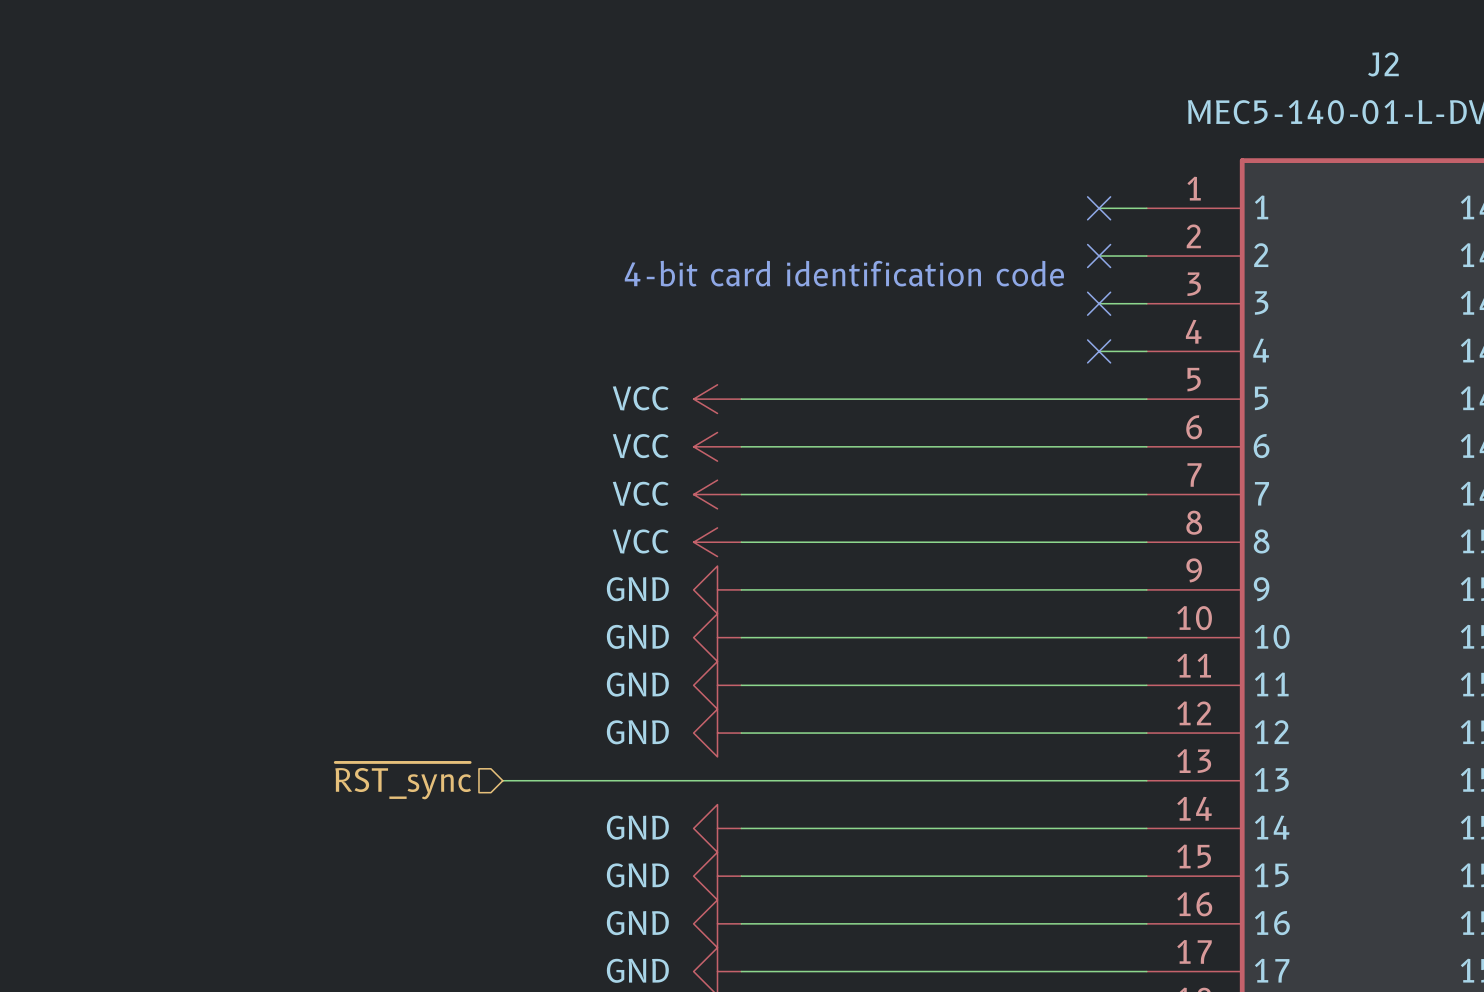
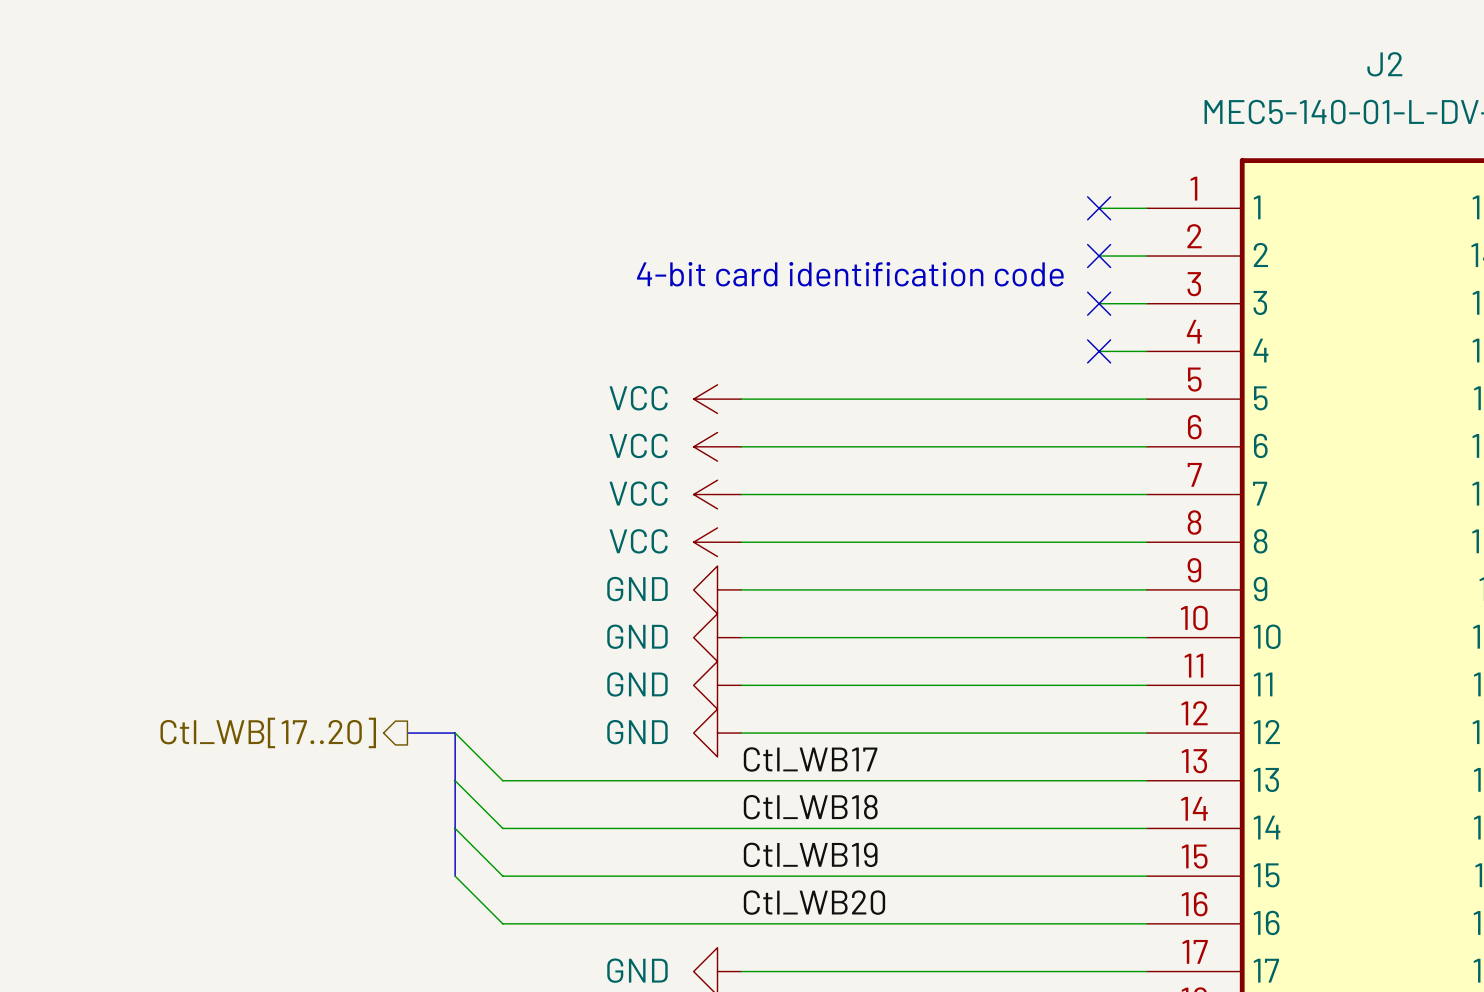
bus: none -> (407, 733) (455, 733) (455, 876)
wire: none -> (455, 733) (502, 780)
hierarchical label: none -> Ctl_WB[17..20] (268, 732)
label: none -> Ctl_WB17 (810, 759)
hierarchical label: ~{RST_sync} (403, 780) -> none
wire: none -> (455, 780) (502, 828) (741, 828)
label: none -> Ctl_WB18 (810, 807)
wire: none -> (455, 828) (502, 876) (741, 876)
power symbol: GND (717, 828) -> none
label: none -> Ctl_WB19 (810, 854)
wire: none -> (455, 876) (502, 923) (741, 923)
power symbol: GND (717, 876) -> none
label: none -> Ctl_WB20 (814, 902)
power symbol: GND (717, 923) -> none

